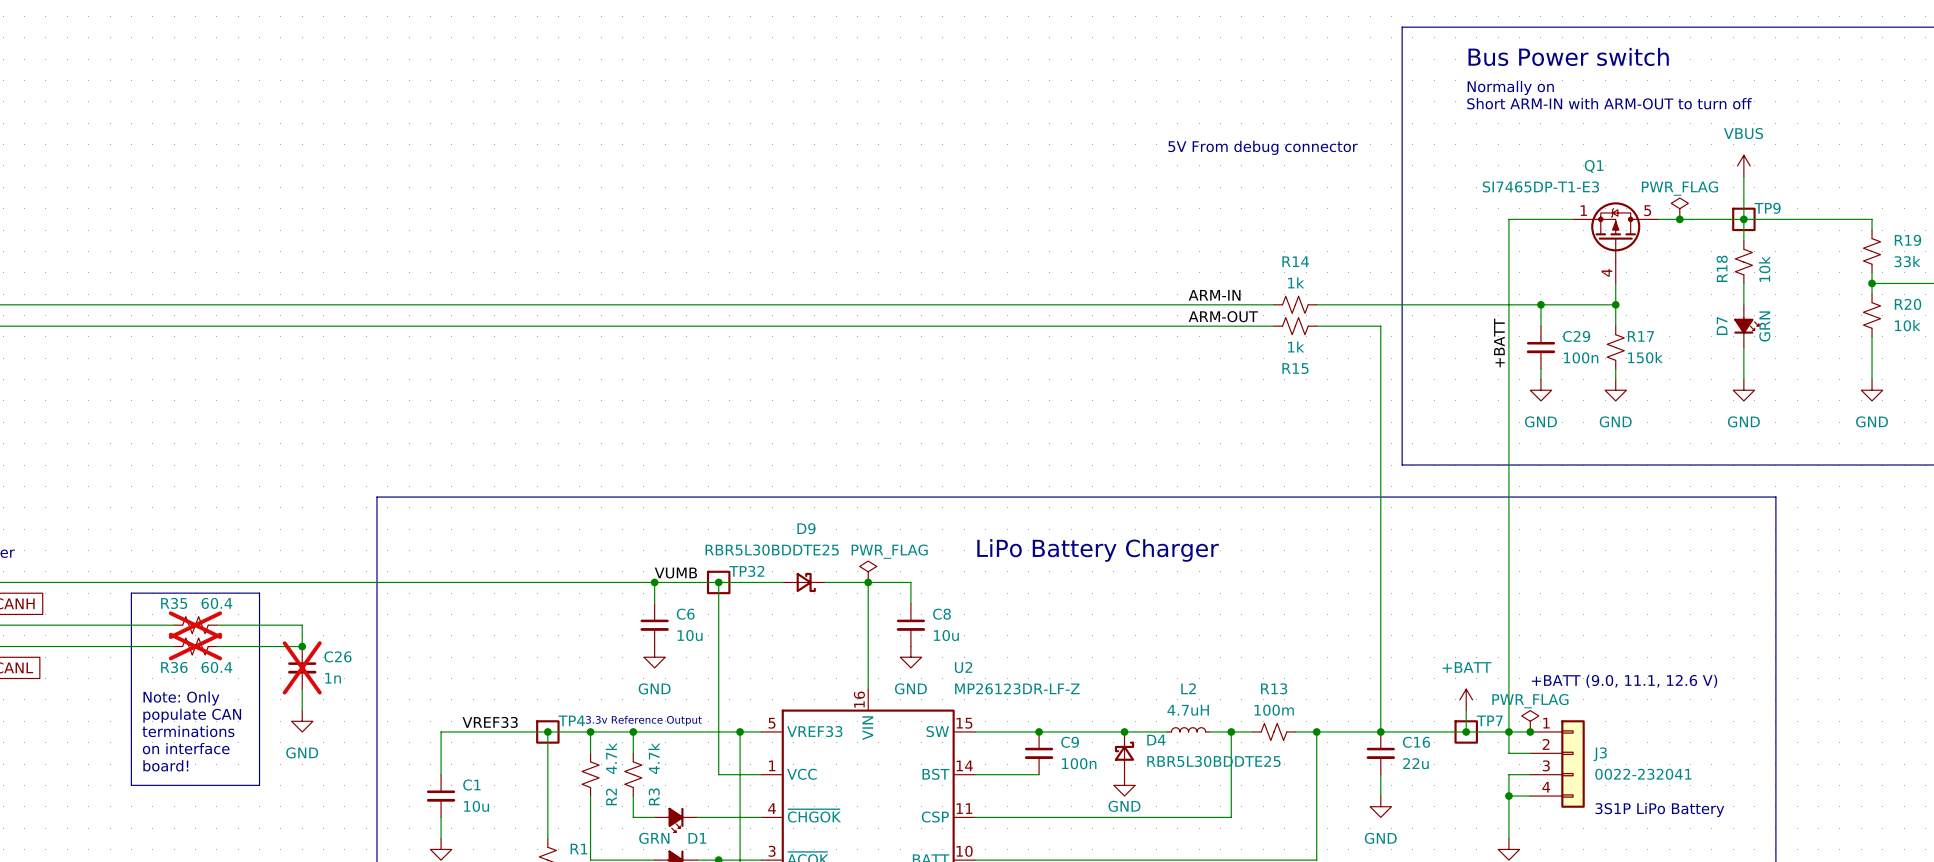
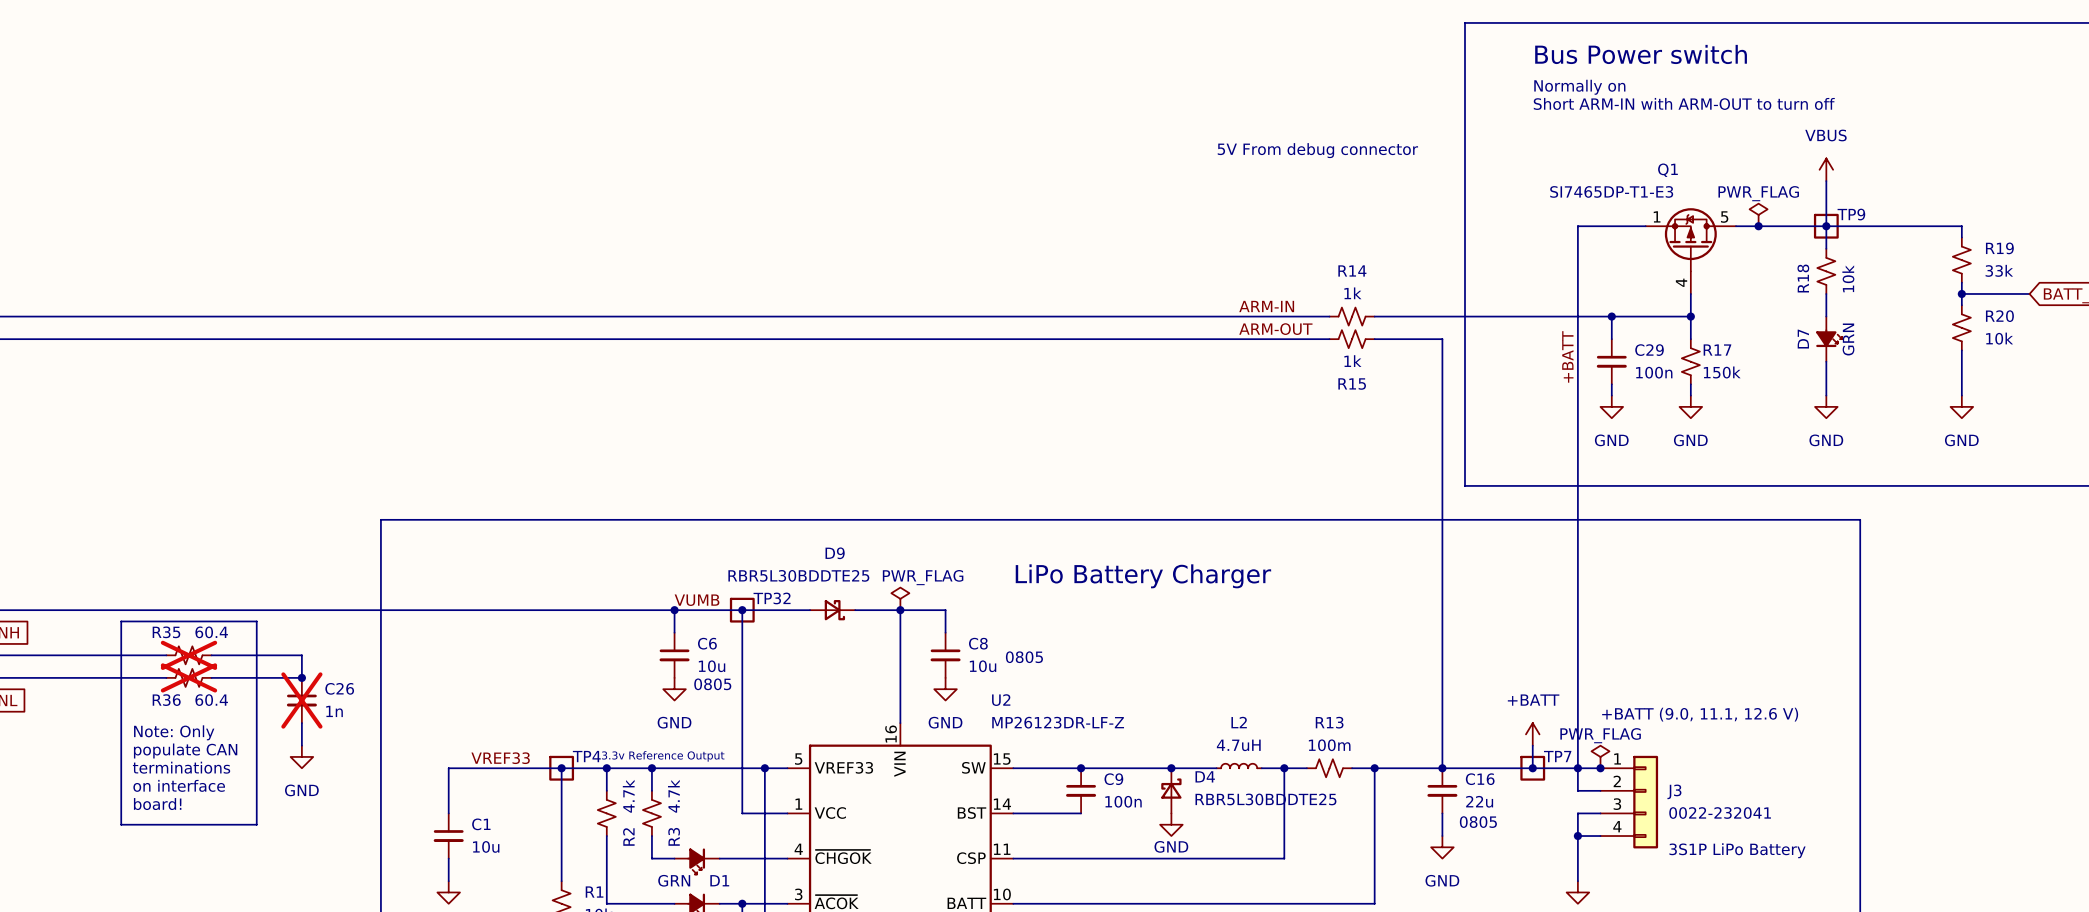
text: none -> 0805 (1024, 657)
text: none -> 0805 (712, 684)
text: none -> 0805 (1478, 822)

